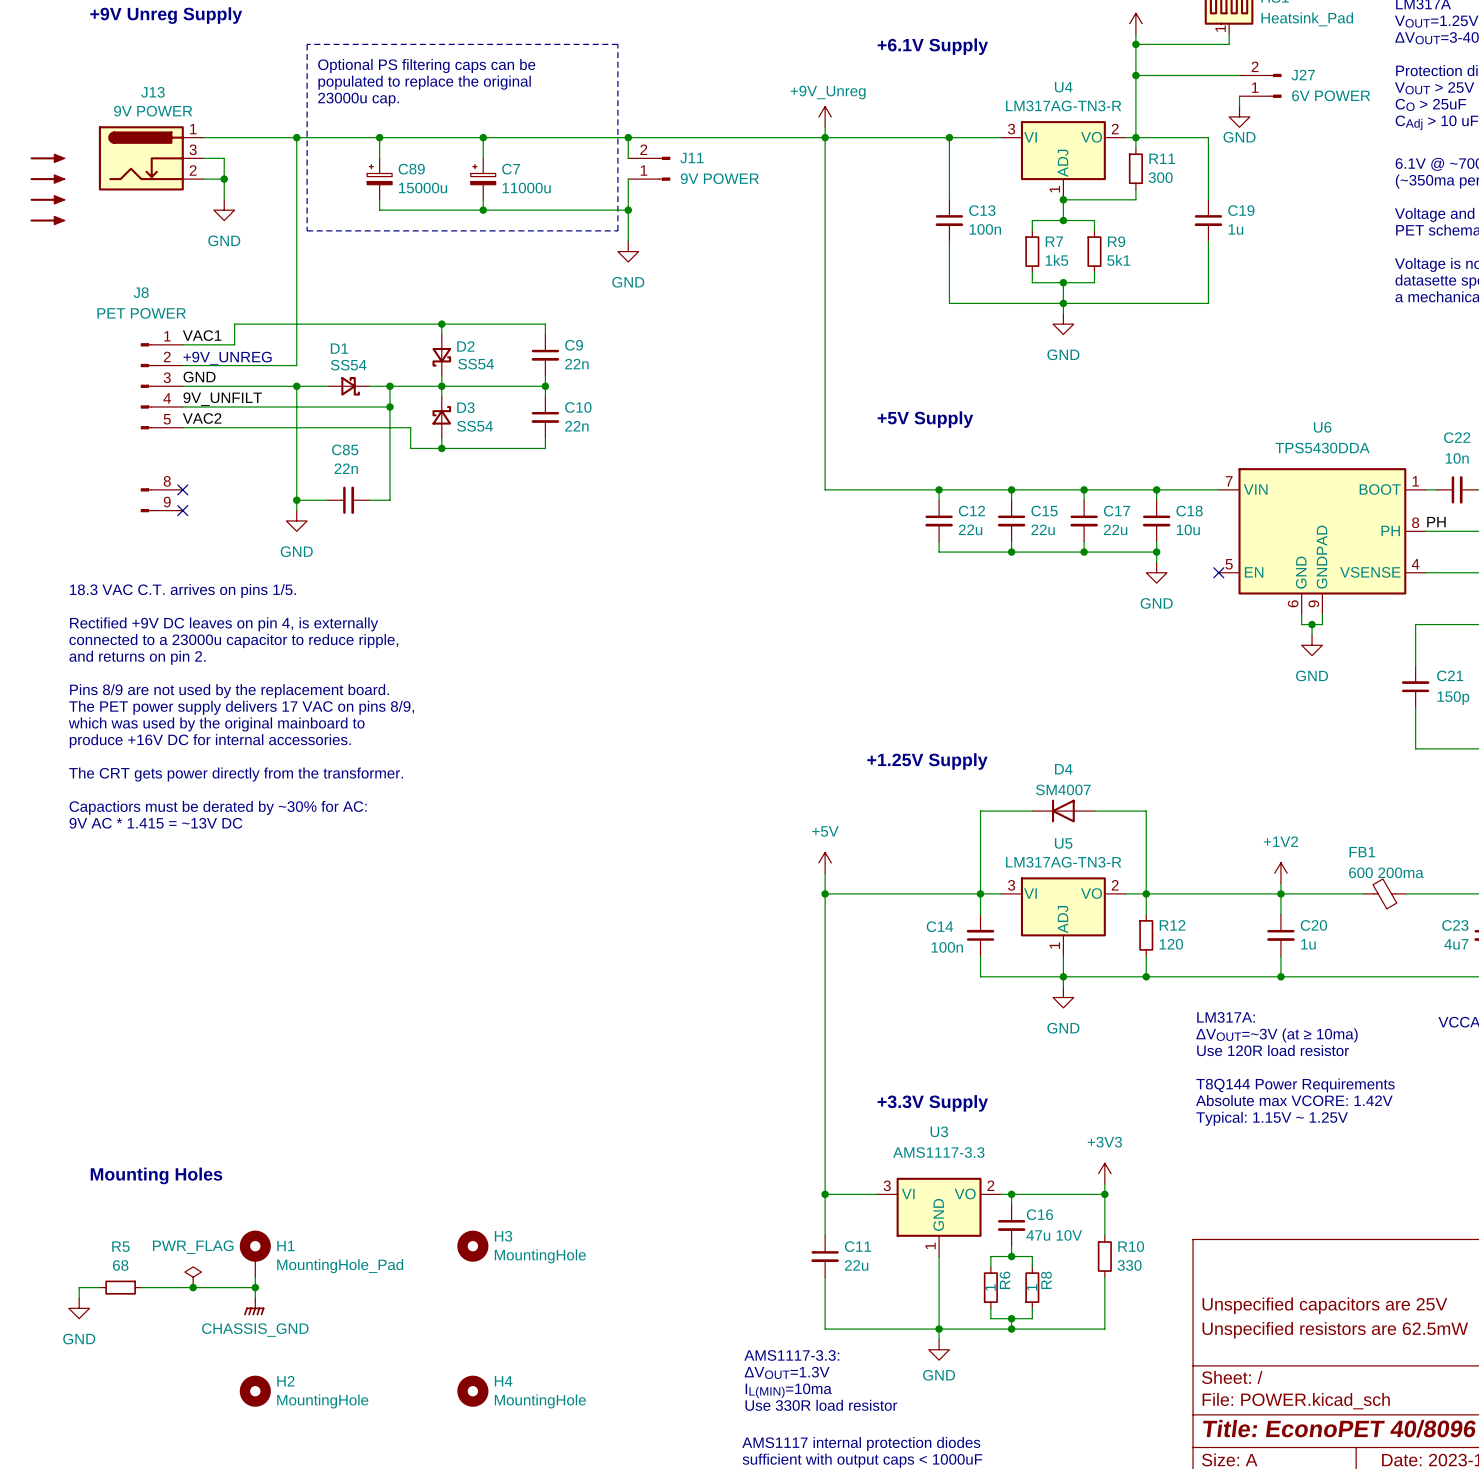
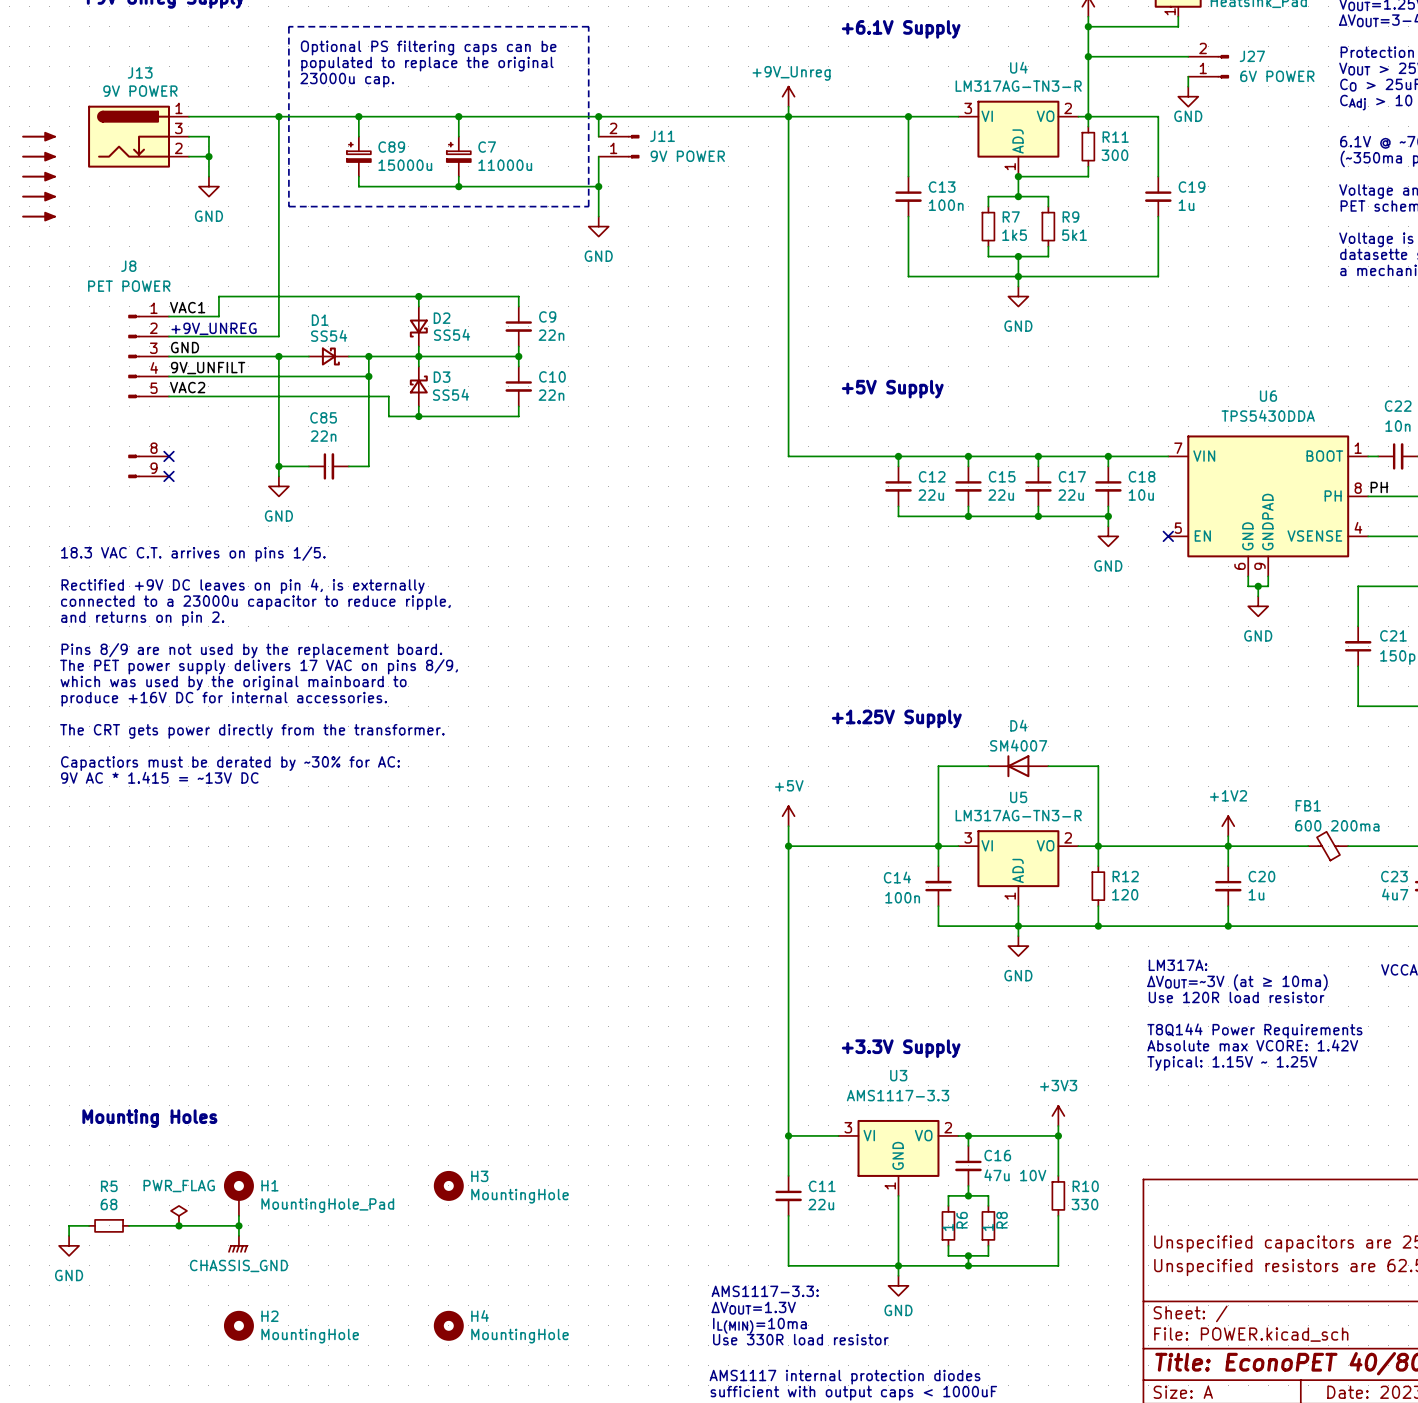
part: none -> (38, 216)

